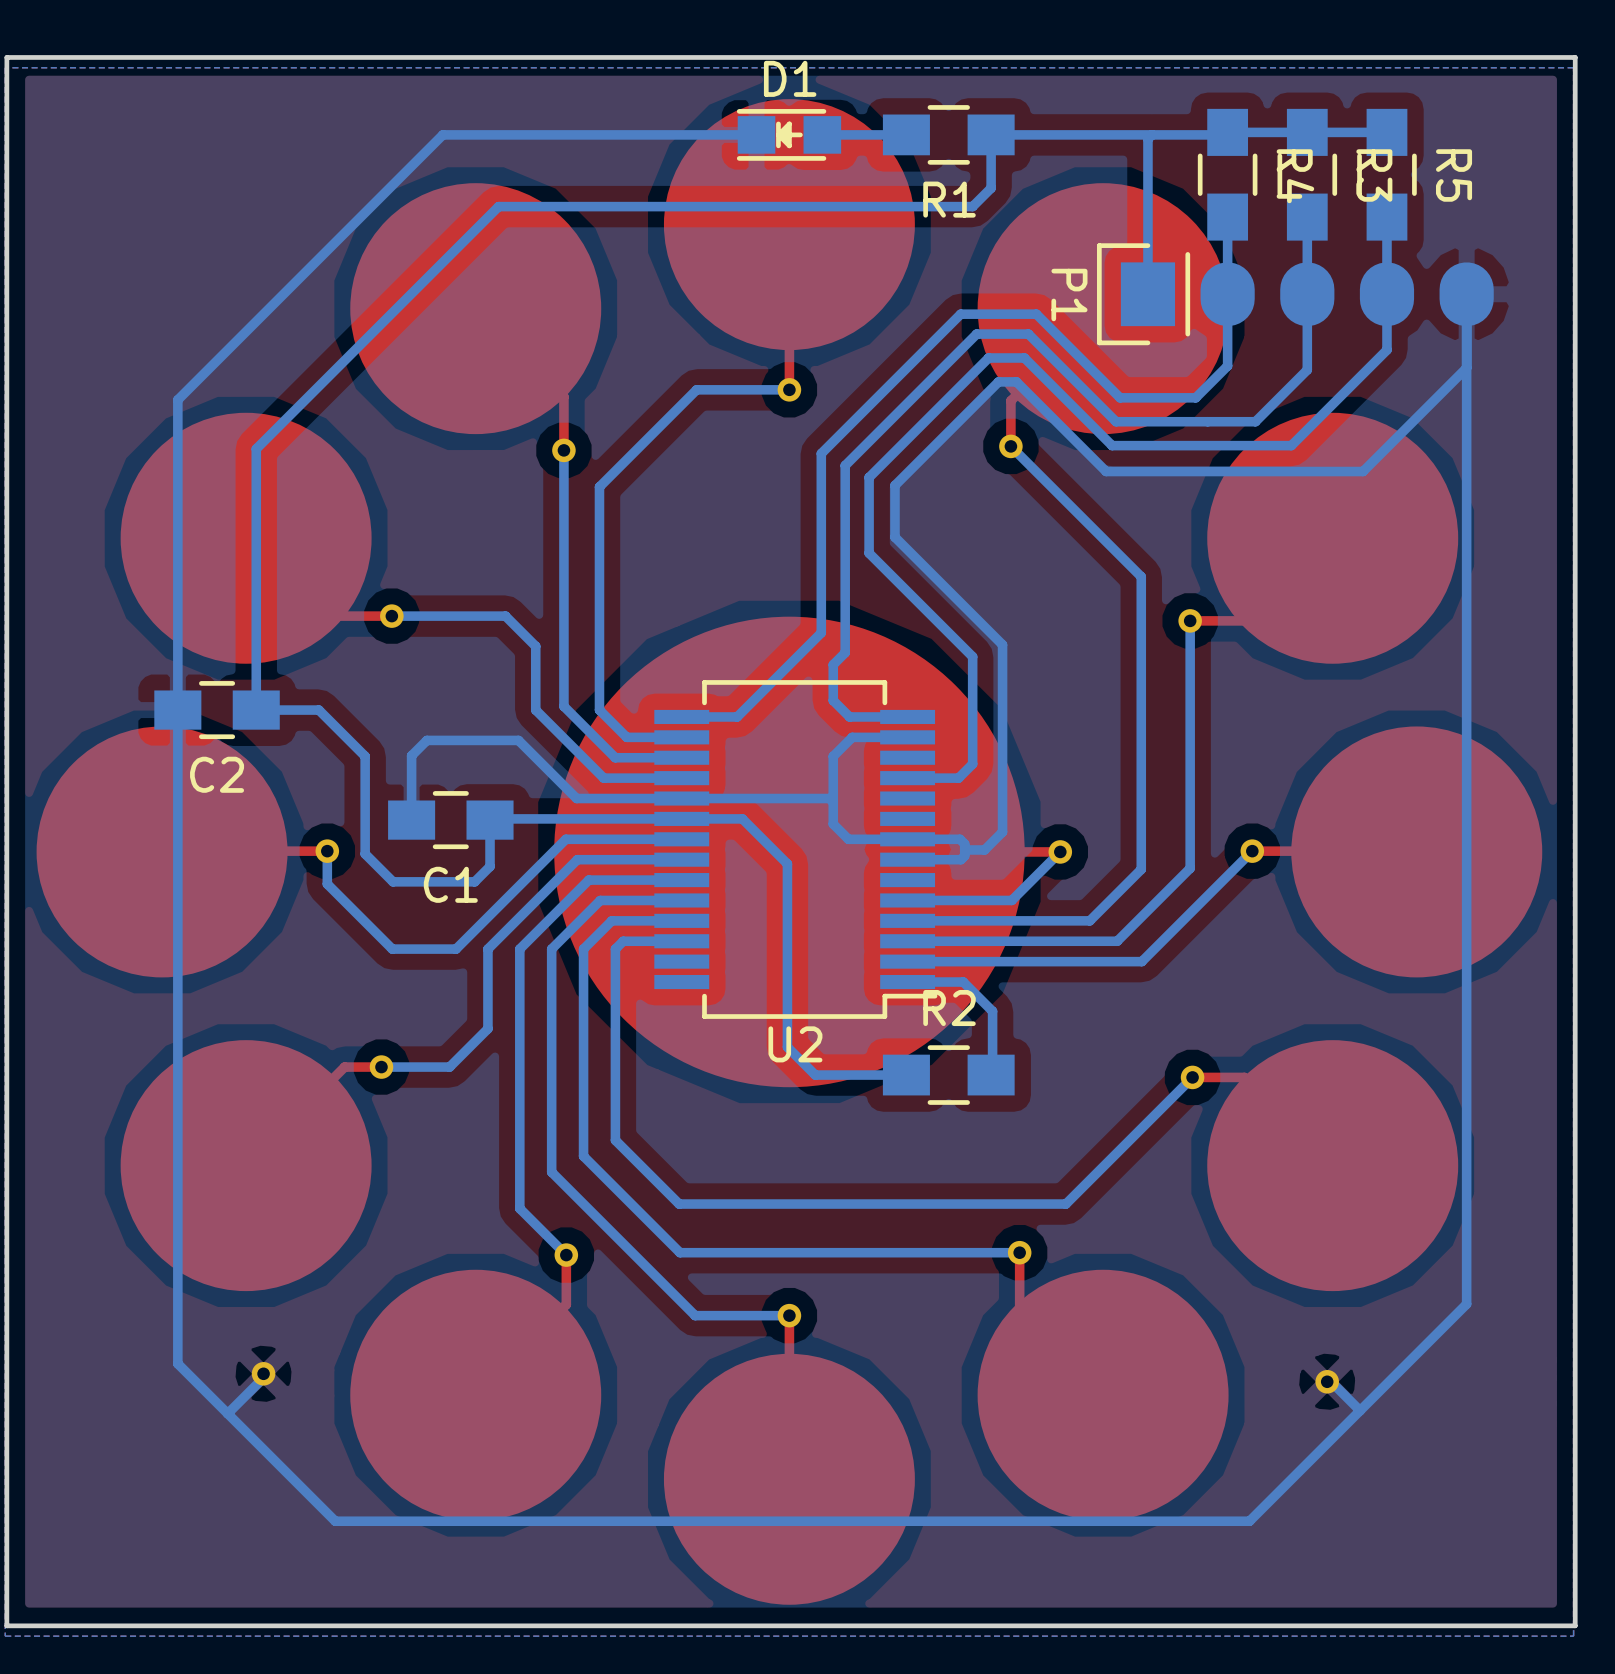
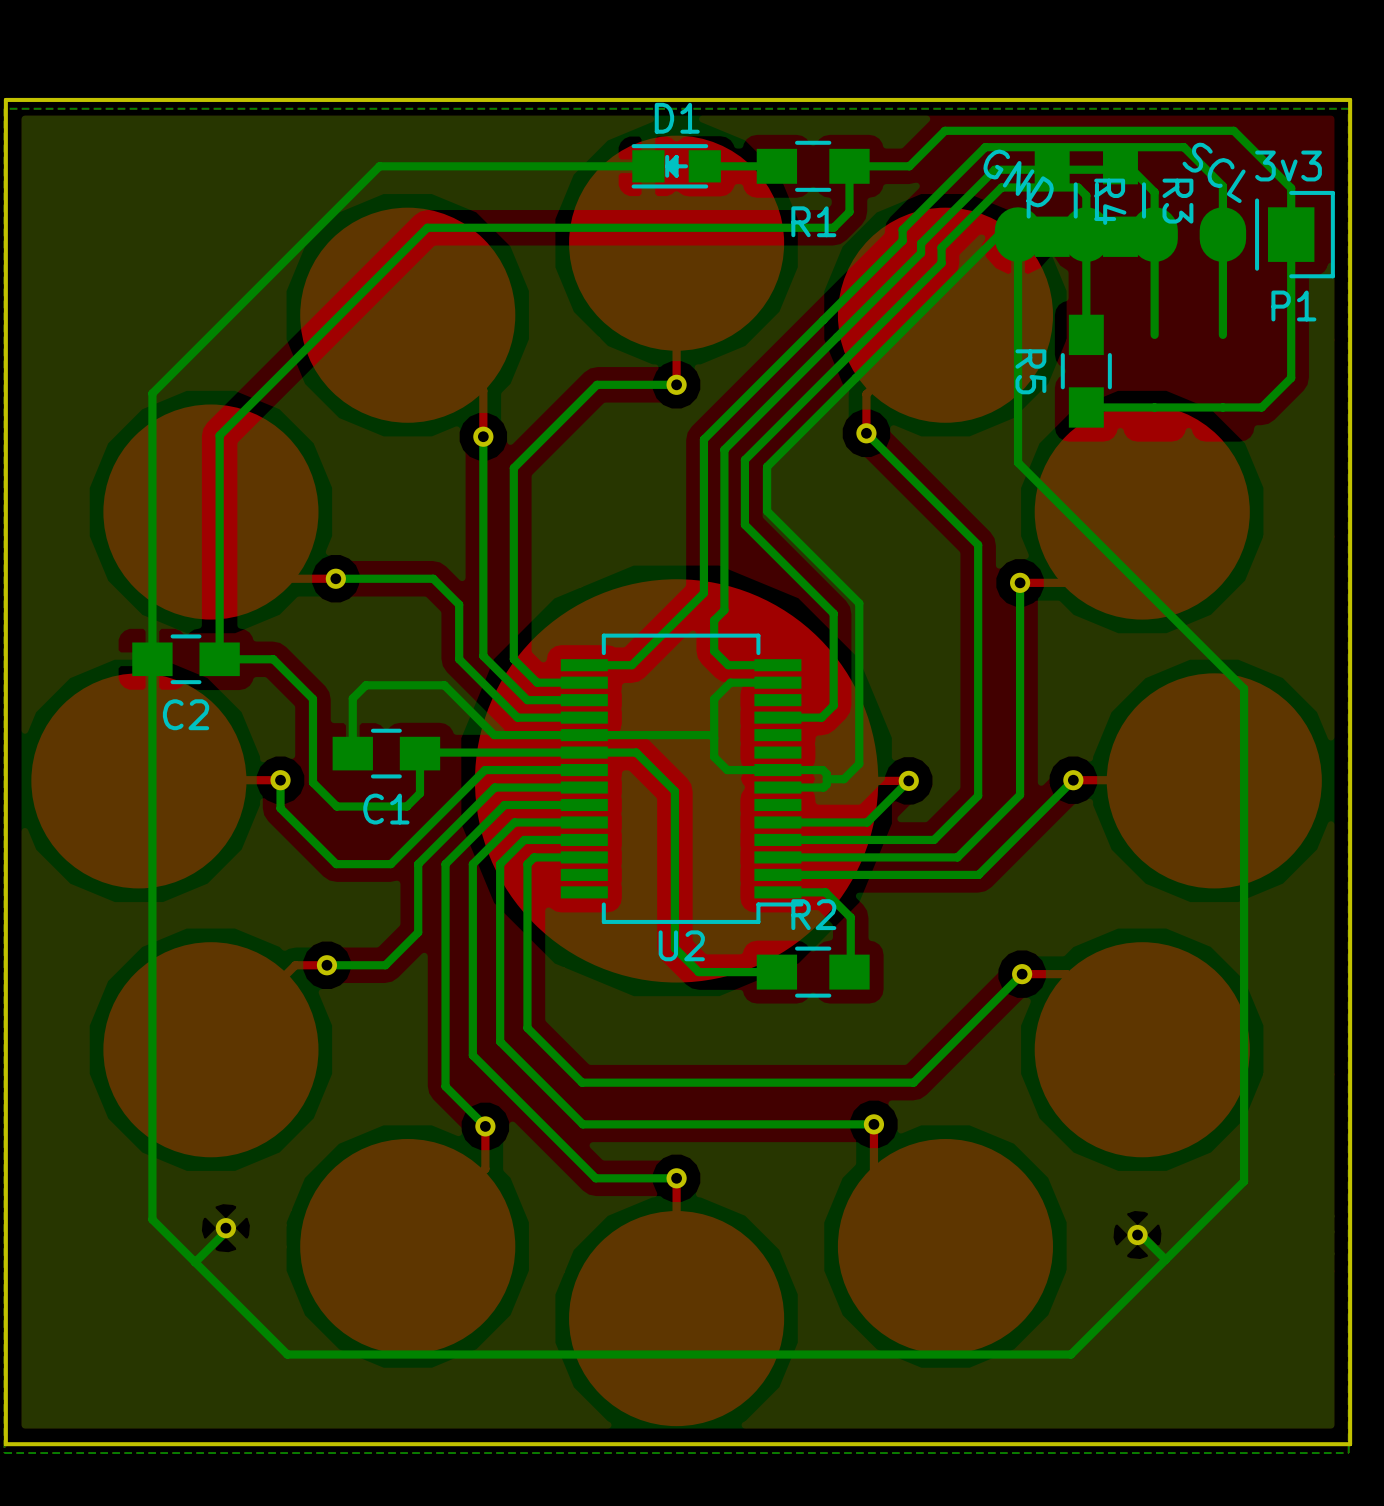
bottom track: (1386, 132) (1061, 134) -> (1086, 407) (1261, 407) (1291, 378) (1291, 188) (1233, 130) (944, 130) (909, 166)
bottom track: (1151, 134) (1147, 138) (1147, 294) -> none
text: none -> 3v3 (1288, 165)
text: none -> SCL (1214, 172)
text: none -> GND (1018, 178)
R5 position: (1386, 174) -> (1086, 371)
R5 name position: R5 (1454, 175) -> R5 (1030, 371)
bottom track: (1227, 217) (1227, 365) (1195, 397) (1120, 397) (1036, 314) (960, 314) -> (1222, 334) (1222, 186) (1183, 147) (985, 147) (902, 229) (902, 240) (823, 319)
bottom track: (1307, 217) (1307, 369) (1255, 421) (1116, 421) (1028, 334) (976, 334) -> (1154, 334) (1154, 192) (1132, 169) (994, 169) (921, 243) (921, 253) (837, 337)
bottom track: (1386, 217) (1386, 350) (1291, 445) (1112, 445) (1024, 357) (988, 357) -> (1086, 334) (1086, 195) (1078, 187) (1001, 187) (941, 247) (941, 263) (847, 357)
P1 rotation: 0° (1295, 294) -> 180° (1164, 234)
bottom track: (1466, 294) (1466, 1304) (1451, 1319) -> (855, 378) (999, 234) (1018, 234) (1018, 462) (1244, 688) (1244, 1181)
P1 name position: P1 (1069, 295) -> P1 (1293, 305)
bottom track: (1466, 367) (1363, 471) (1106, 471) (1016, 381) (998, 381) -> none

